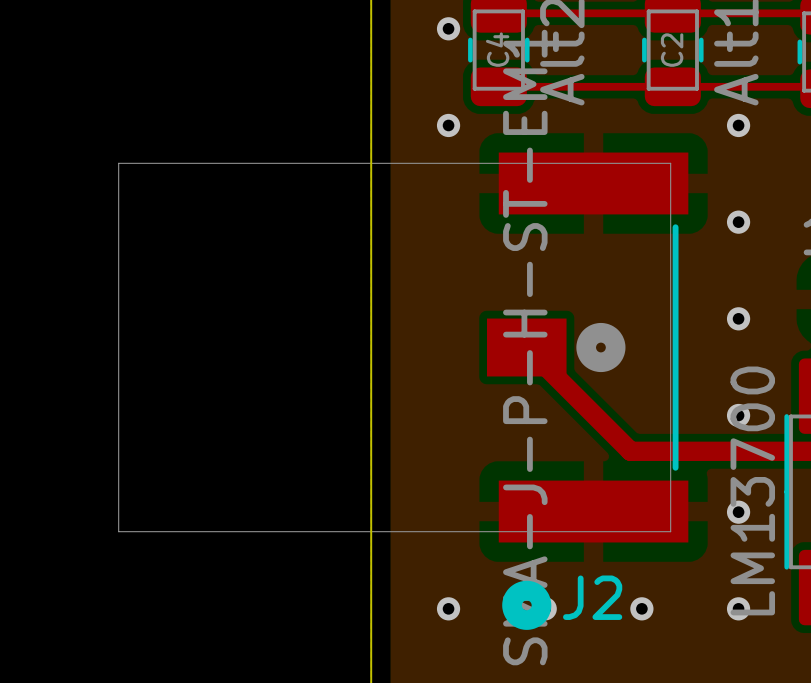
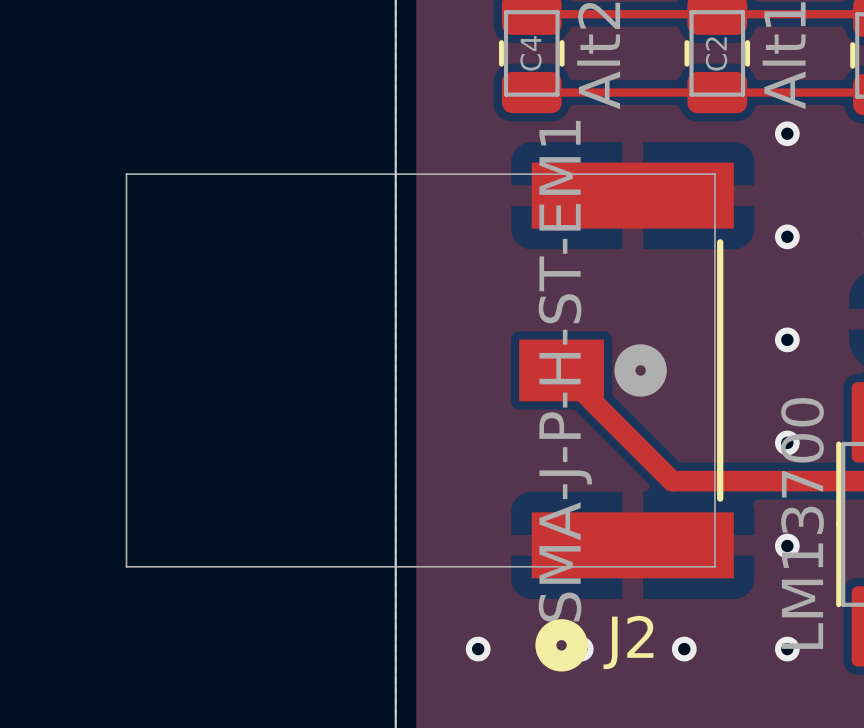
via: (448, 28) -> none
via: (448, 125) -> none

